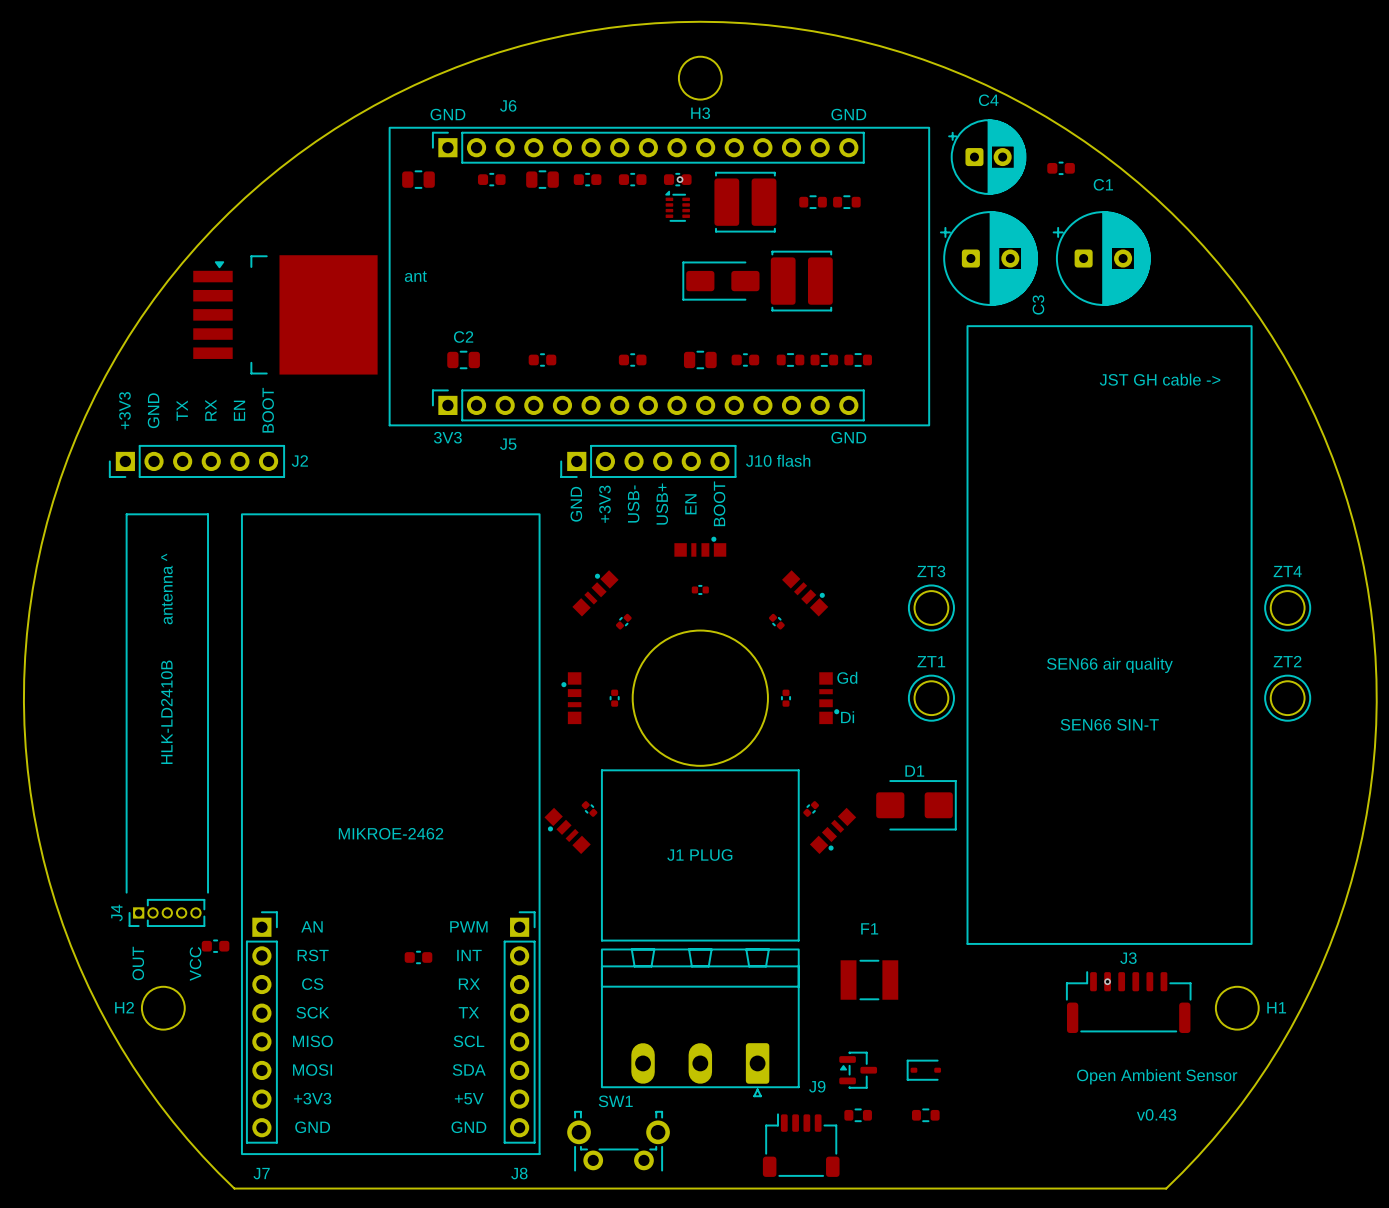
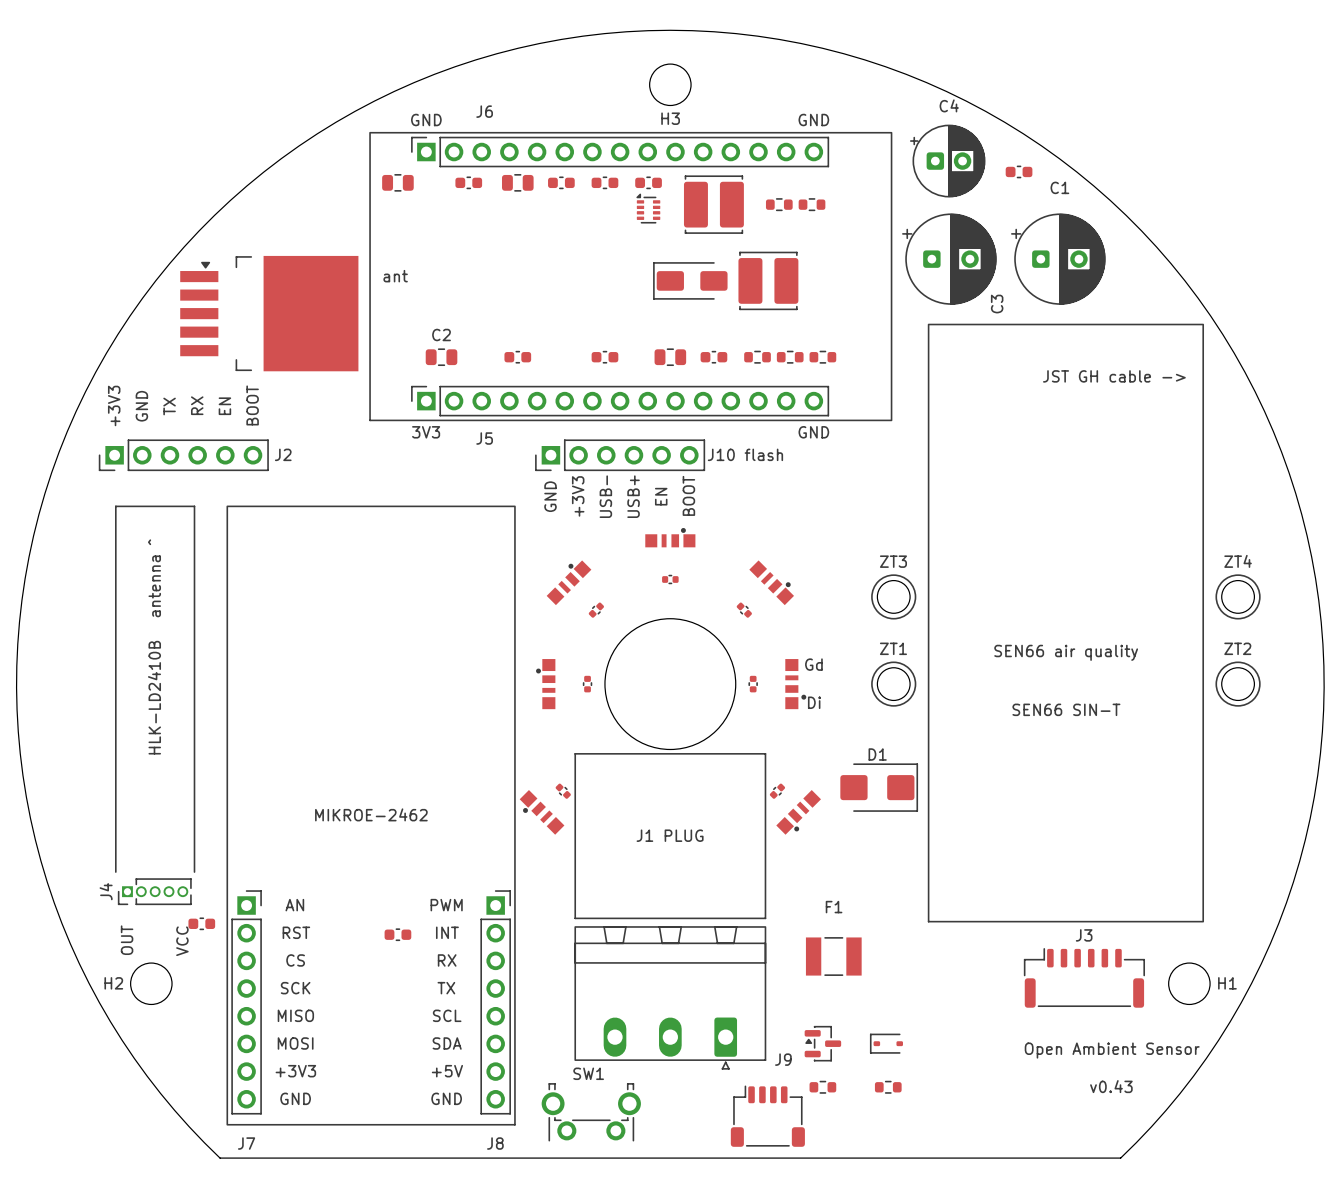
via: (680, 179) -> none
part footprint: [819, 672, 840, 725] -> [785, 659, 807, 710]
via: (1107, 981) -> none

